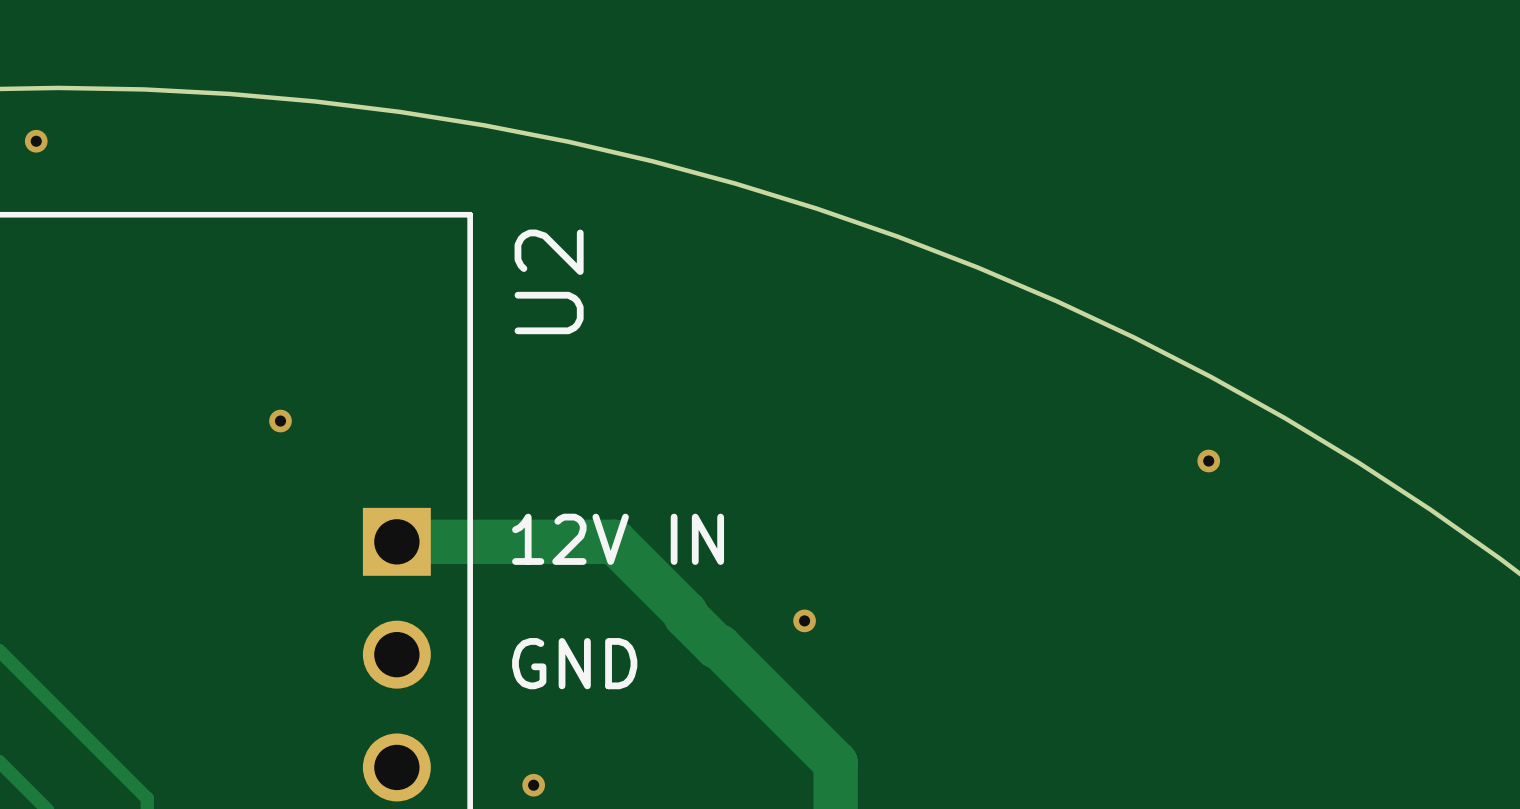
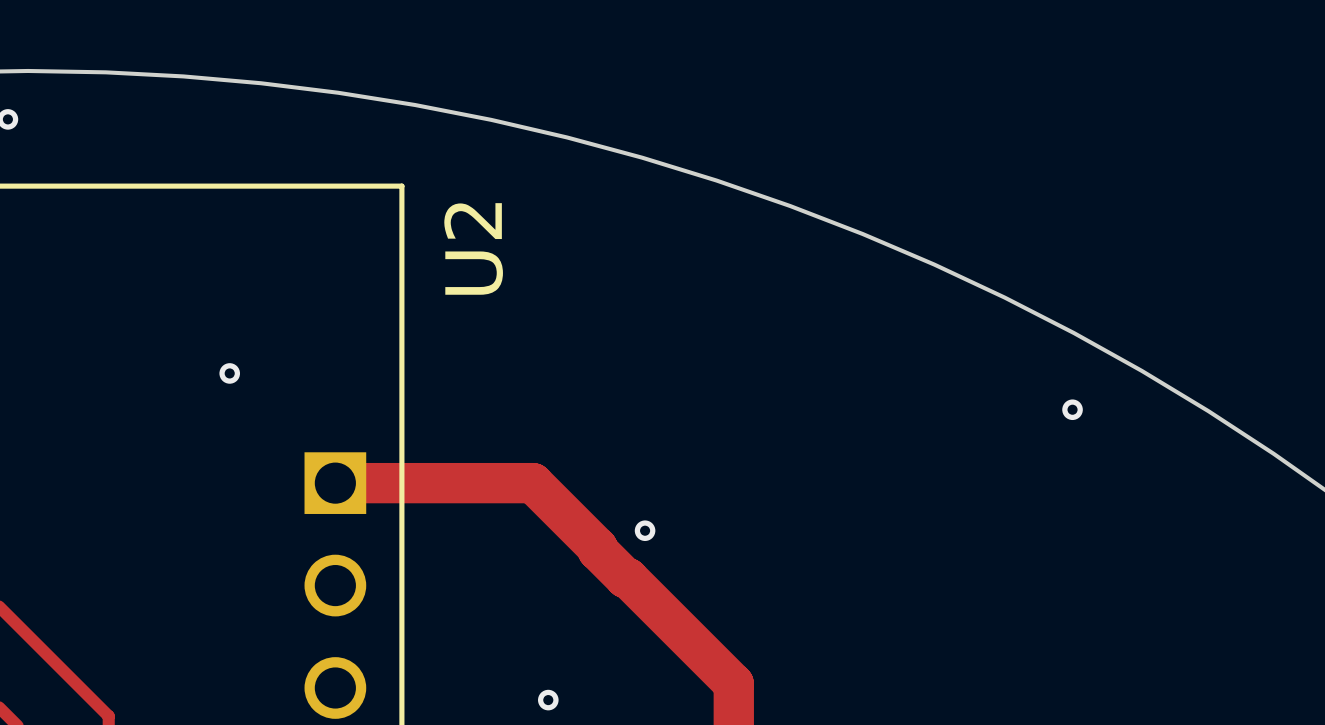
text: 12V IN (618, 539) -> none
via position: (804, 620) -> (645, 530)
text: GND (574, 663) -> none
via position: (533, 785) -> (548, 700)

